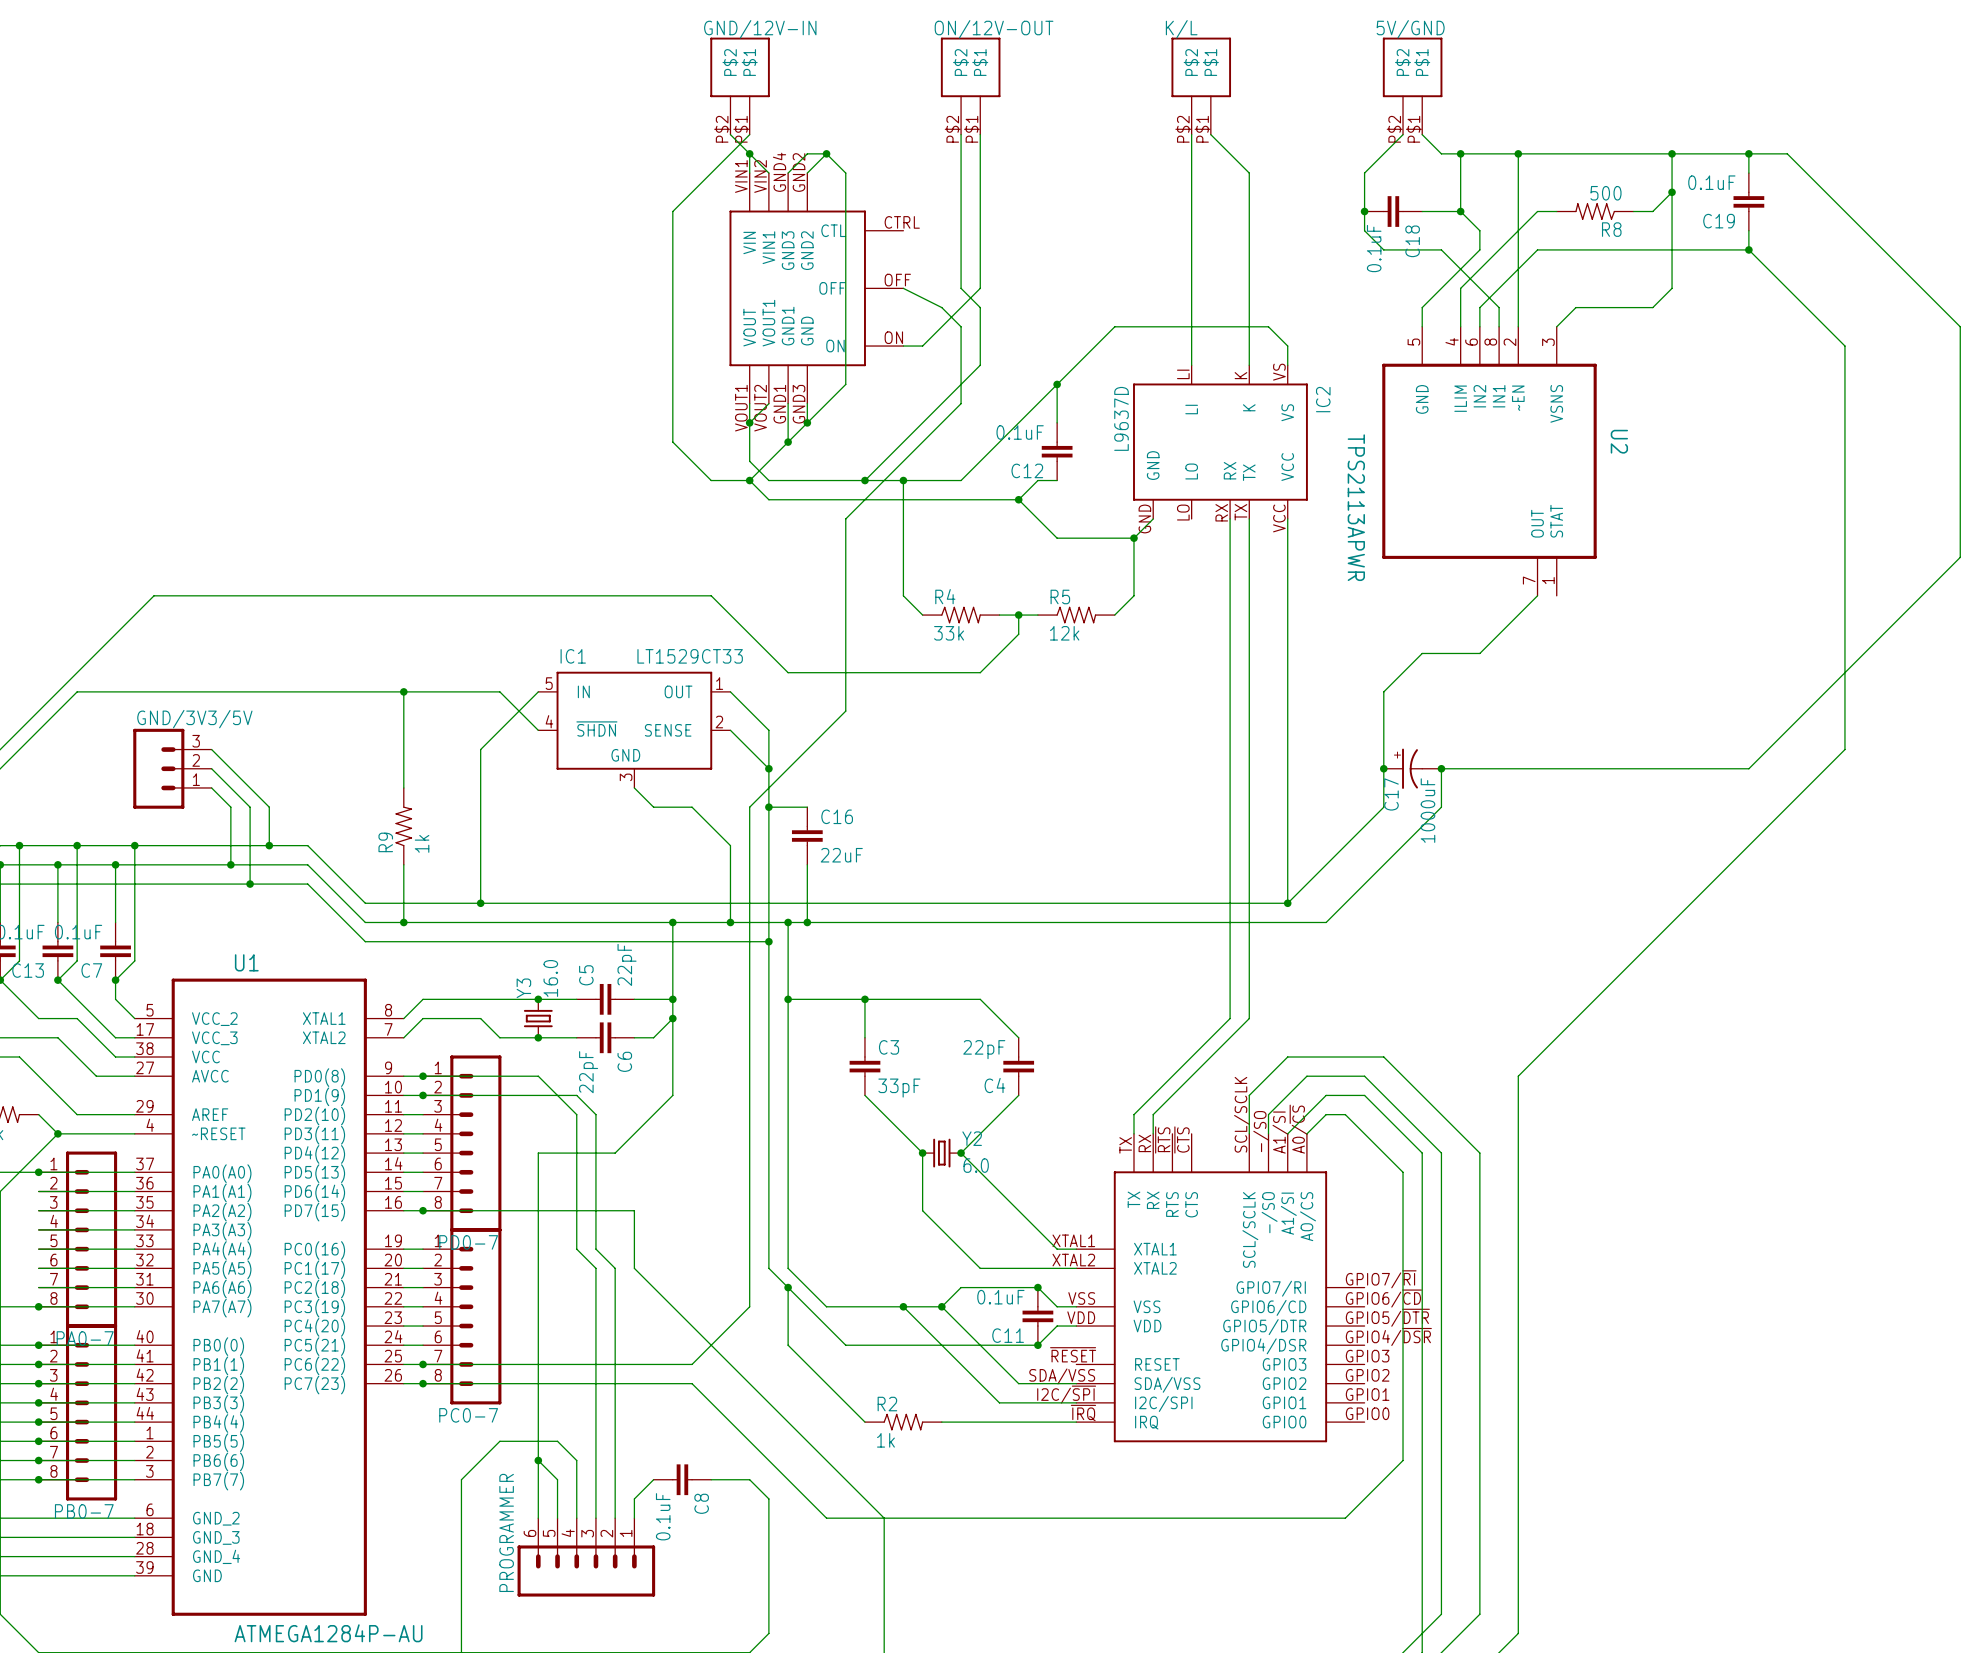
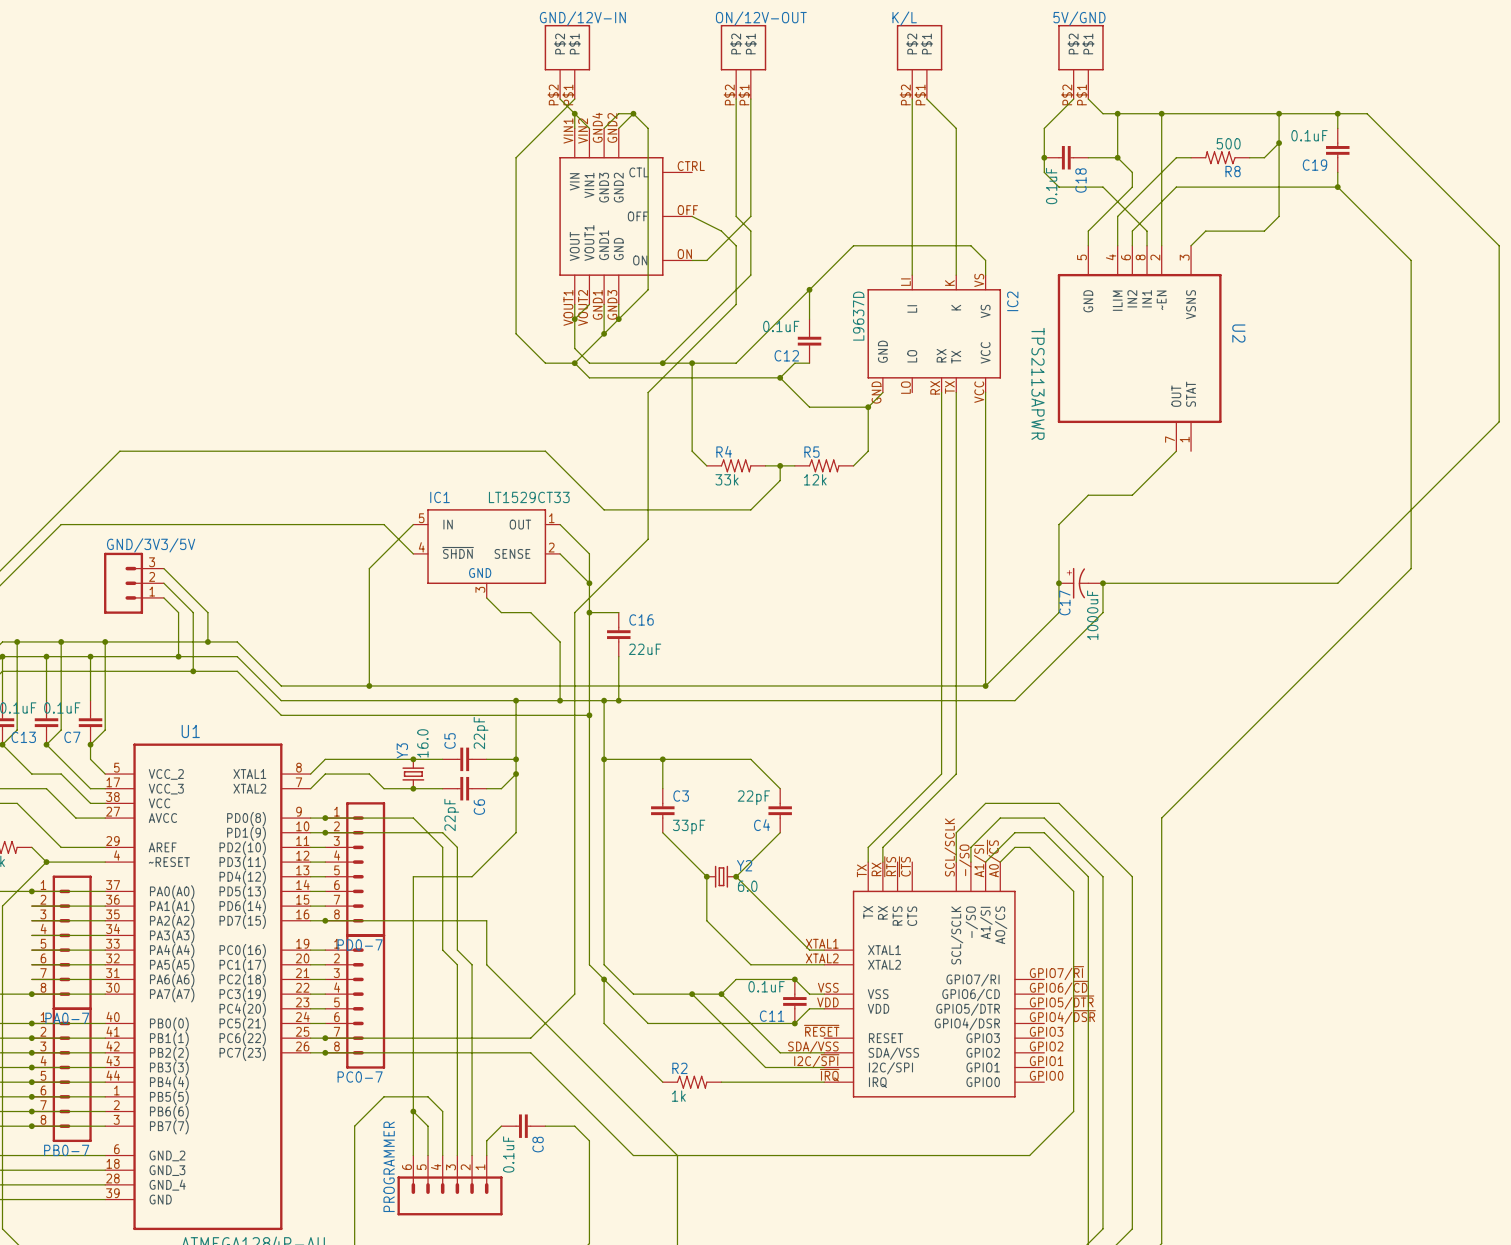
wire: (403, 691) (403, 787) -> none
junction: (403, 691) -> none
R9: 1k (403, 826) -> none
wire: (403, 864) (403, 922) -> none
junction: (403, 922) -> none

